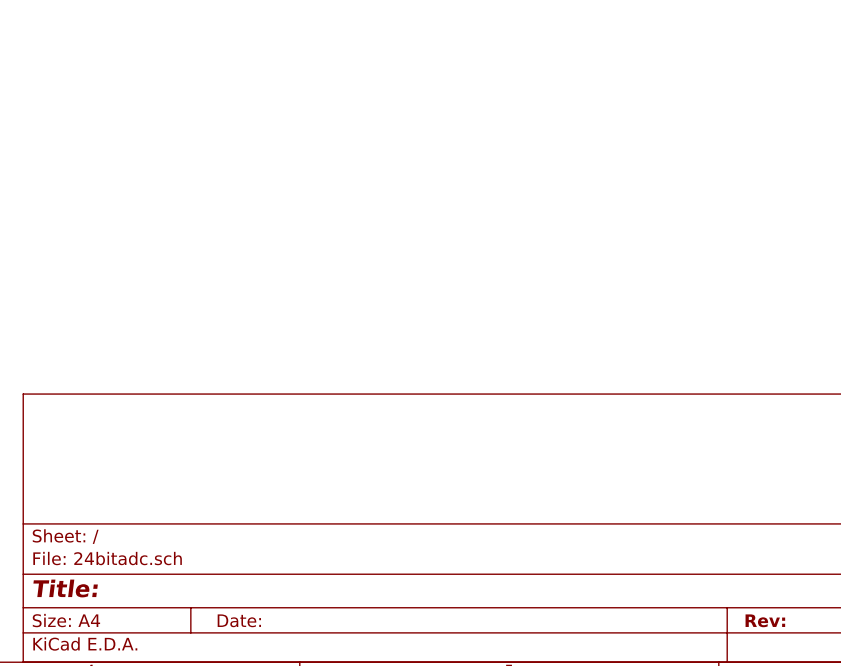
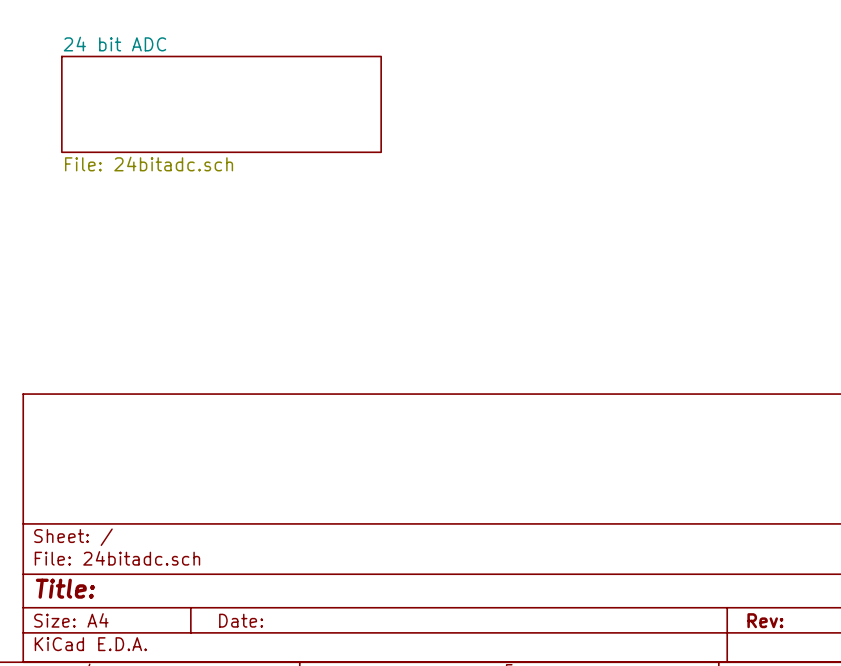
sheet 24 bit ADC: none -> File: 24bitadc.sch (221, 104)

